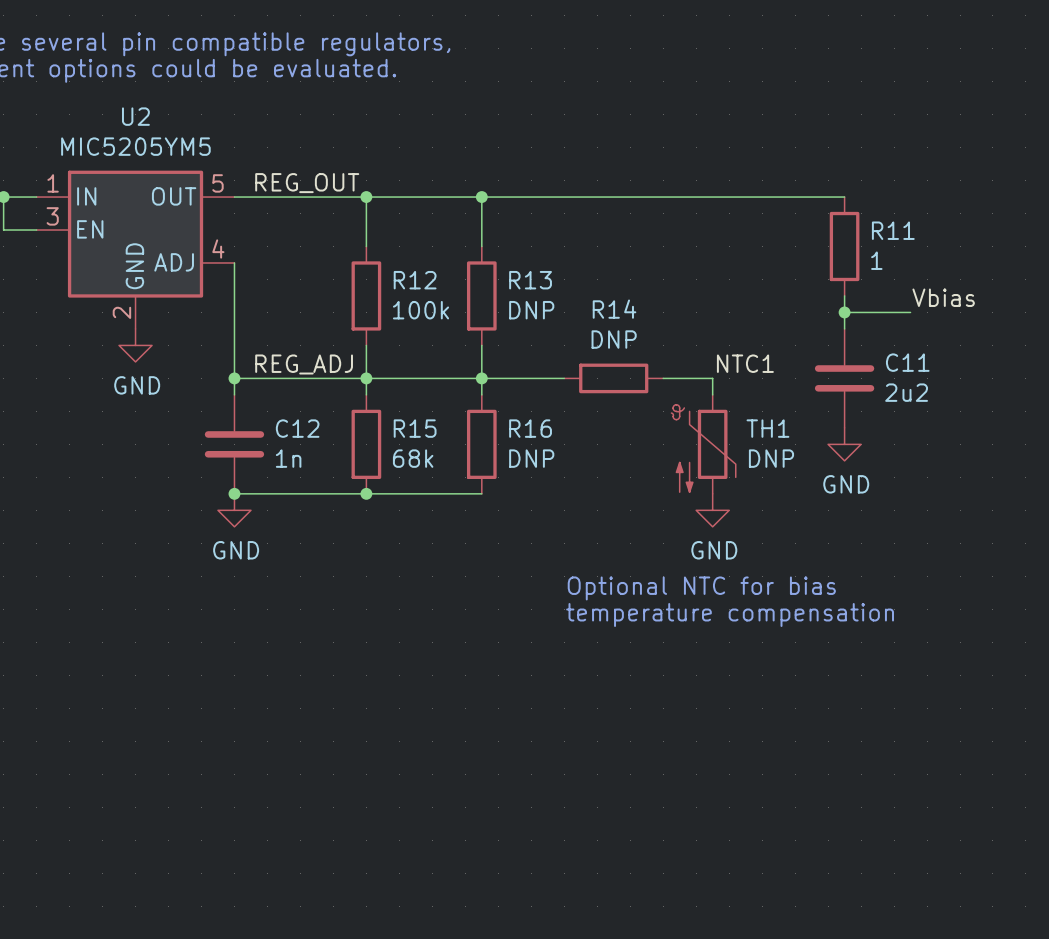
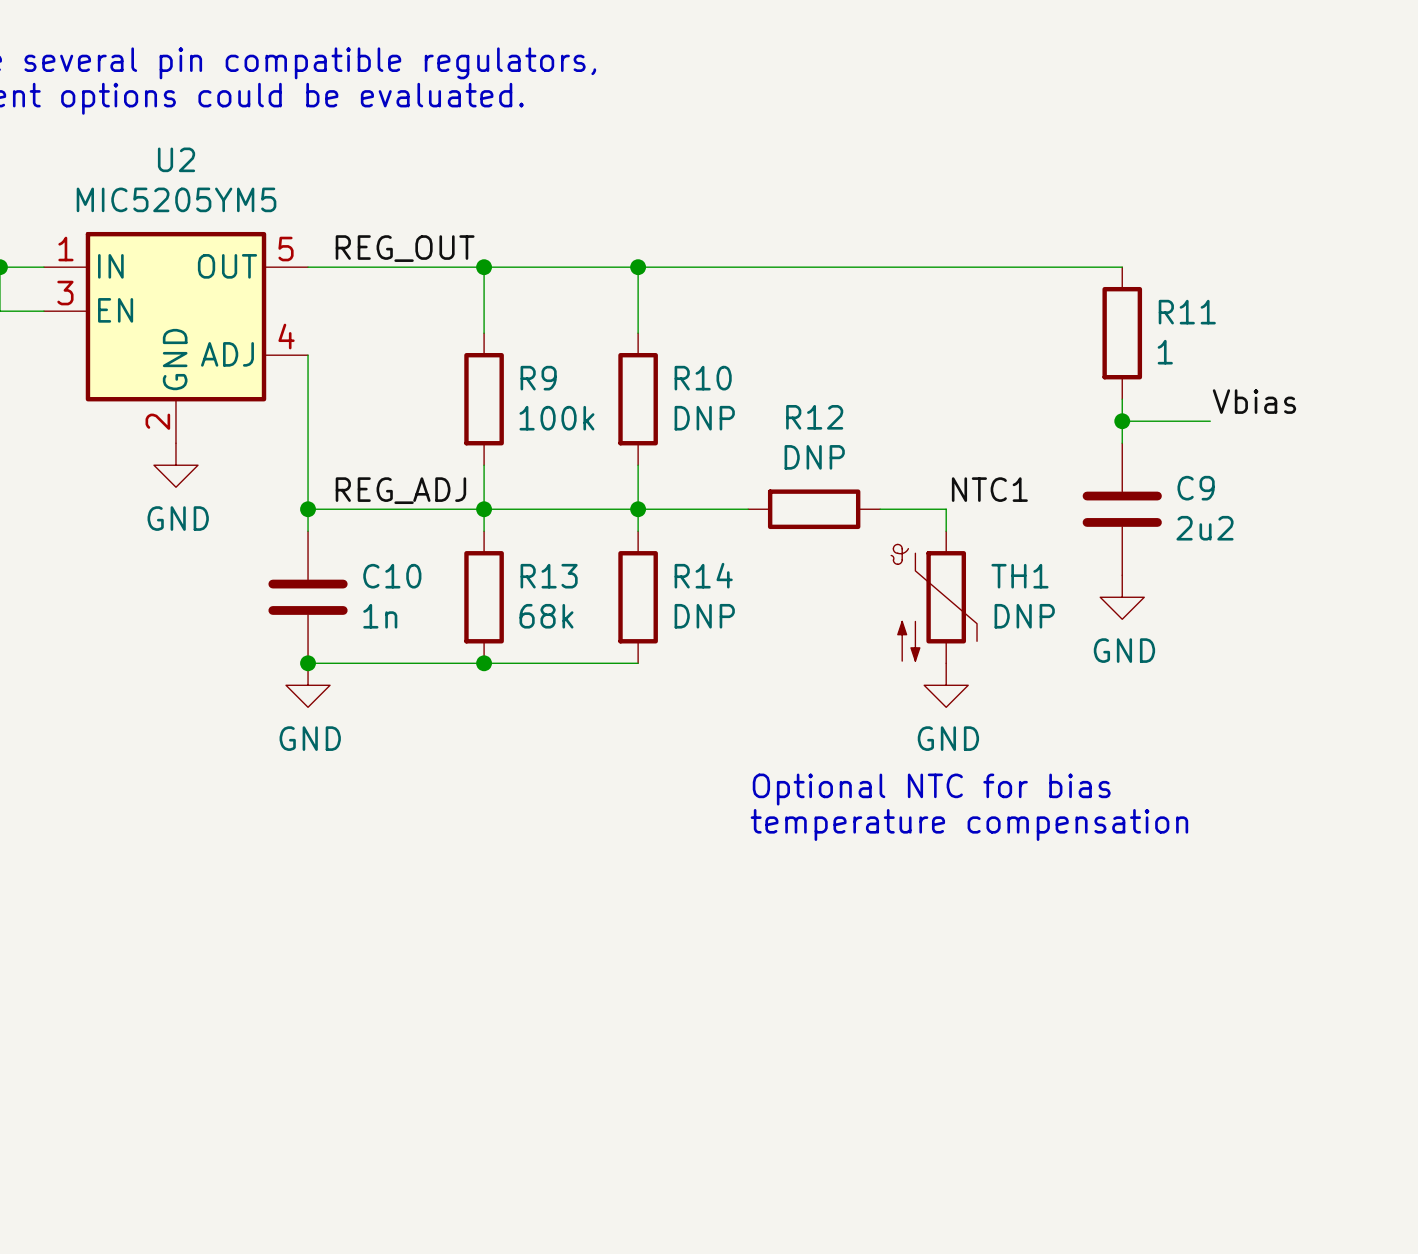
R12 name: R12 (415, 280) -> R9 (538, 378)
R13 name: R13 (530, 280) -> R10 (703, 378)
R14 name: R14 (614, 309) -> R12 (814, 417)
C11 name: C11 (907, 362) -> C9 (1196, 488)
C12 name: C12 (297, 428) -> C10 (392, 576)
R15 name: R15 (415, 428) -> R13 (549, 576)
R16 name: R16 (530, 428) -> R14 (703, 575)

